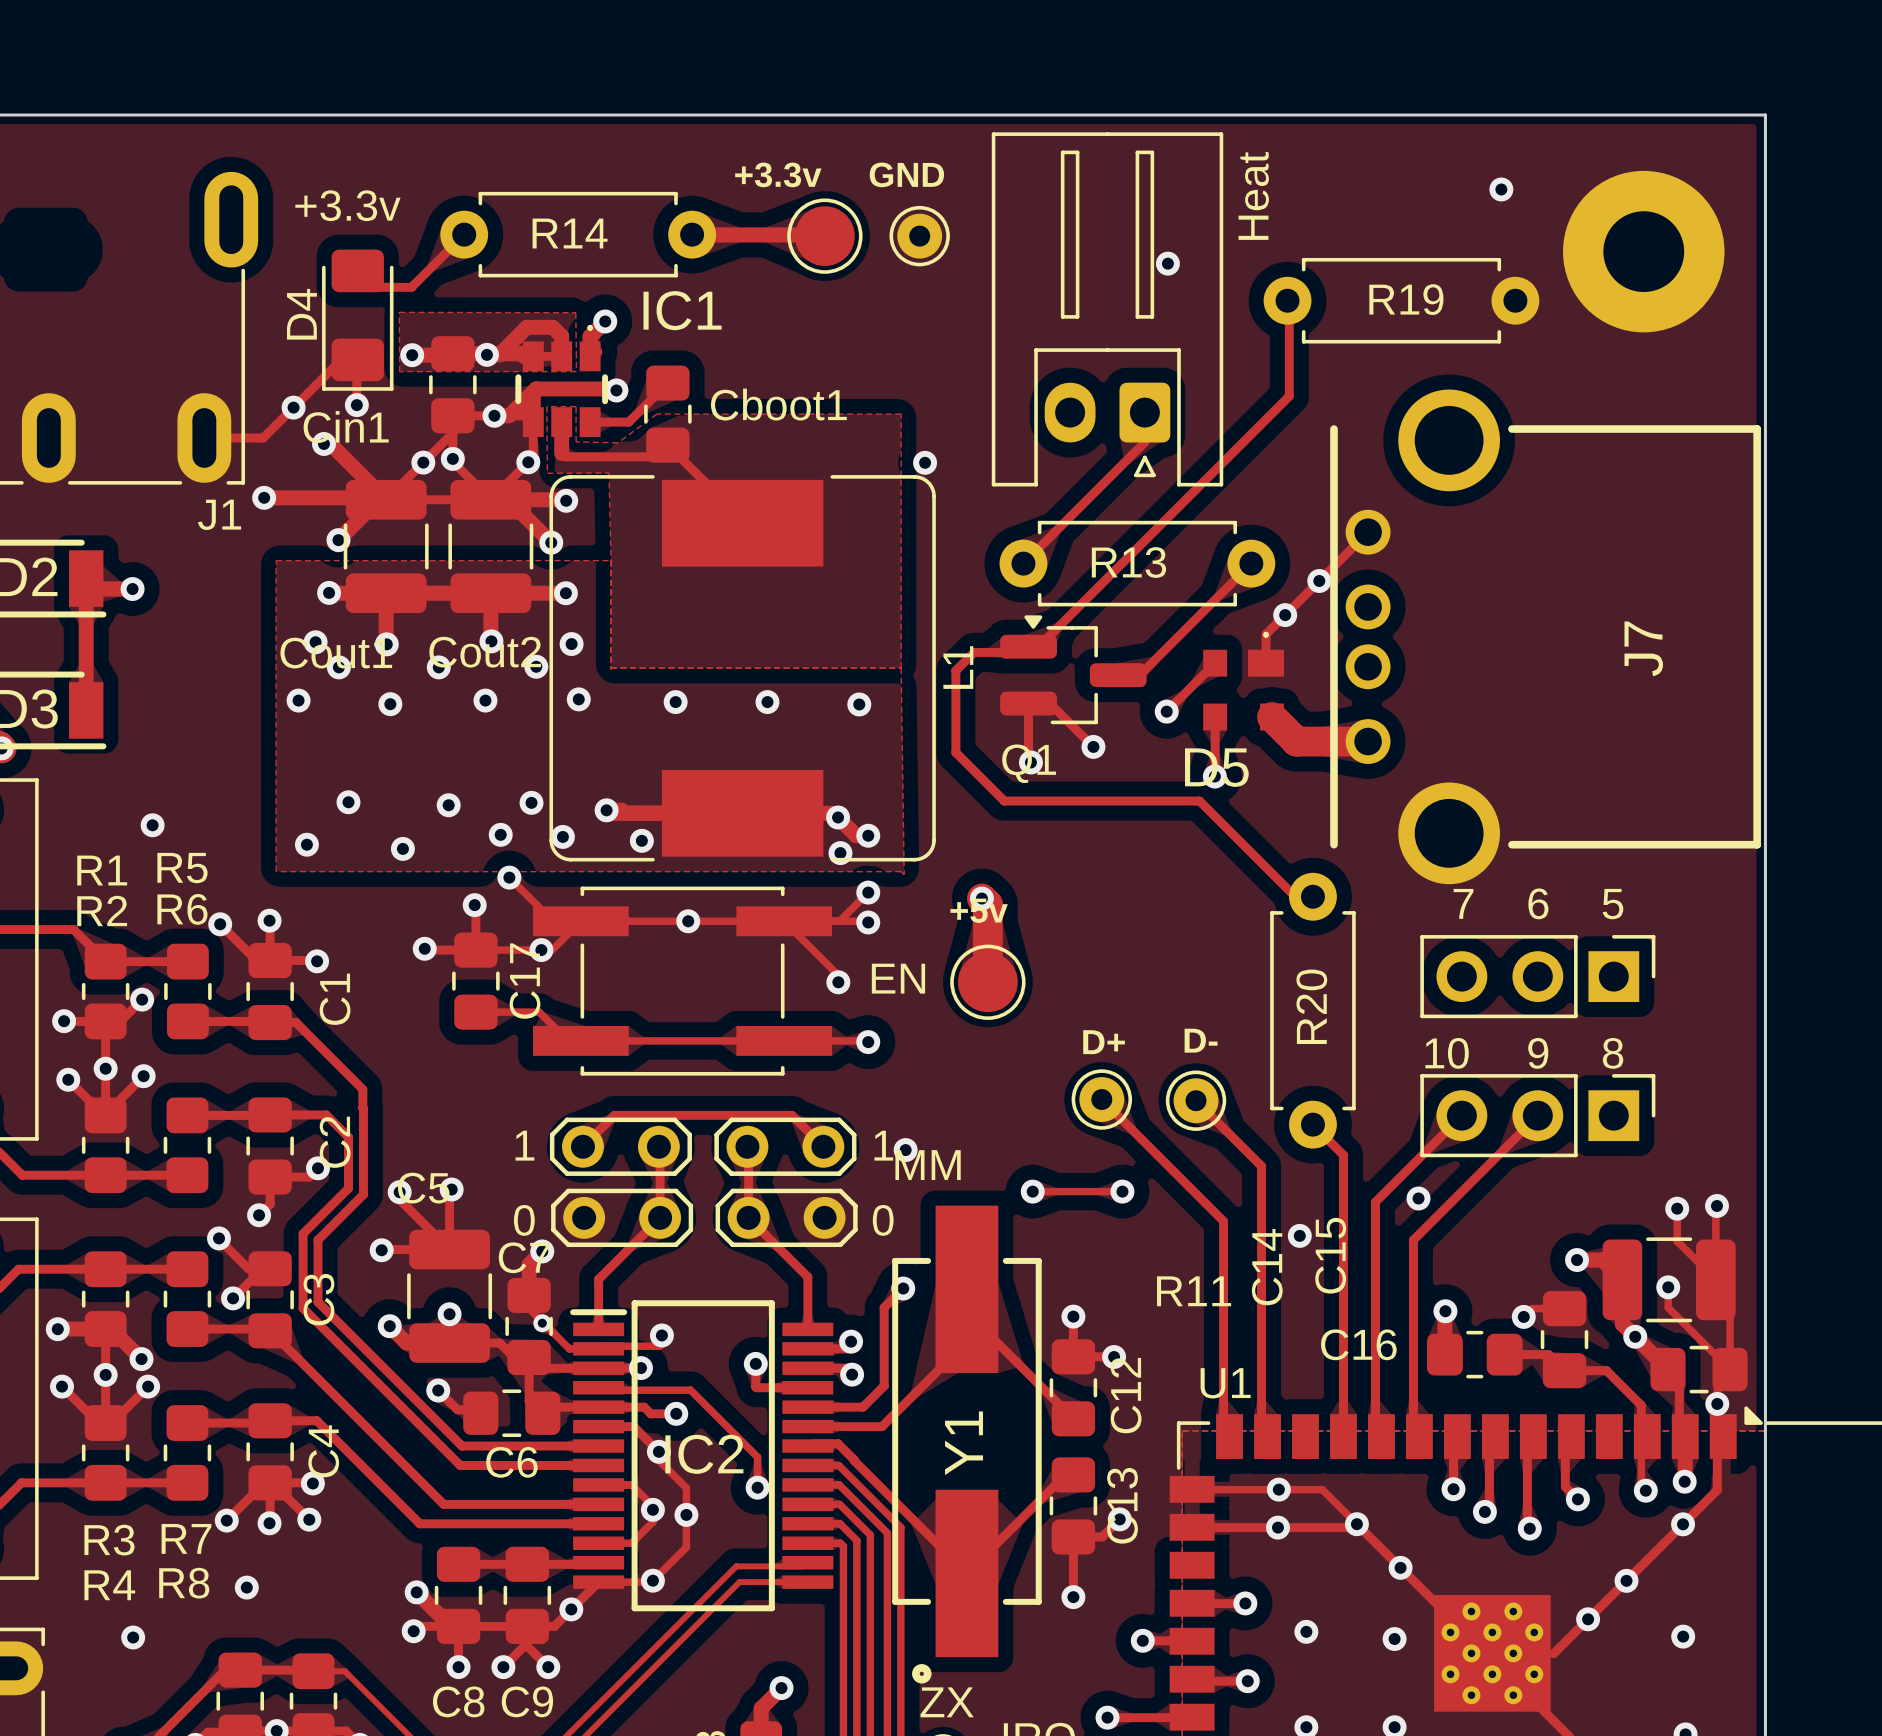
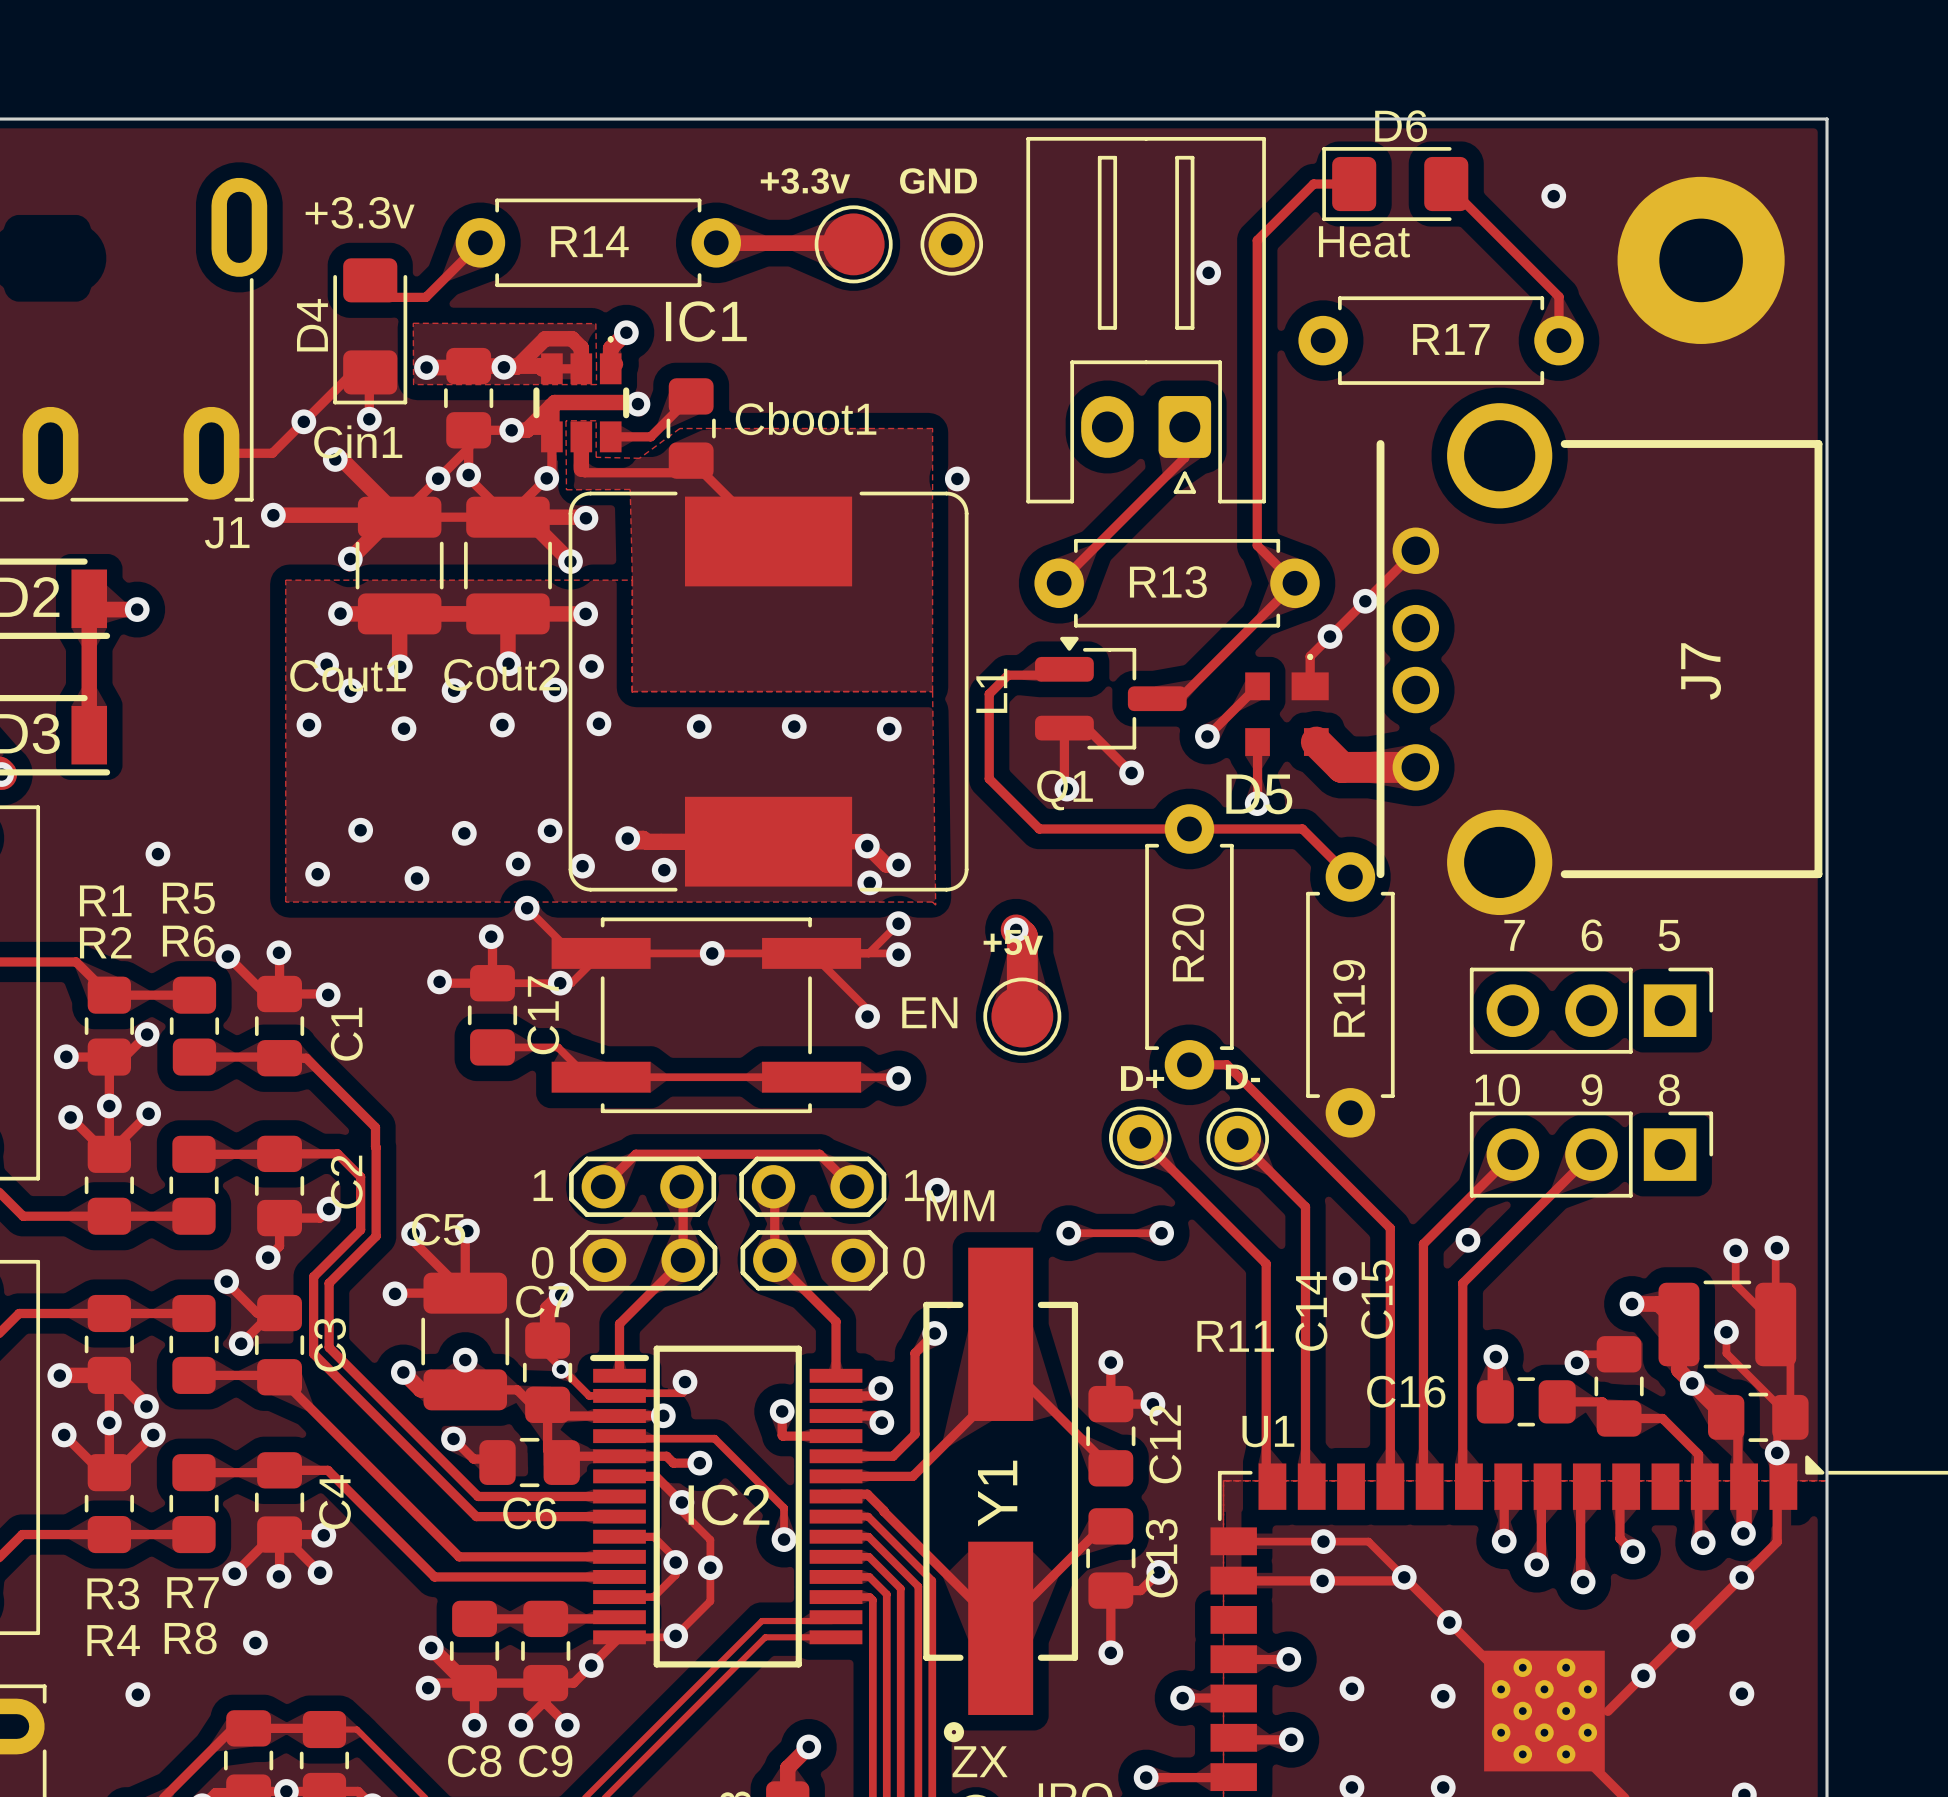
track: none -> (1354, 184) (1313, 184) (1257, 240) (1257, 545) (1295, 583)
D6: none -> (1395, 184)
track: none -> (1446, 184) (1558, 296) (1558, 340)
text rotation: 0° (1253, 195) -> 90° clockwise (1364, 241)
track: (1287, 300) (1289, 302) (1289, 396) (1038, 646) (1028, 646) -> none
R19 rotation: 0° (1401, 300) -> 90° clockwise (1350, 994)
R19 position: (1401, 300) -> (1350, 994)
R17: none -> (1441, 340)
track: (1199, 801) (1295, 896) (1312, 896) -> (1241, 829) (1302, 829) (1350, 876)
R20 position: (1312, 1010) -> (1189, 946)
track: (1305, 1132) (1312, 1124) (1343, 1155) (1343, 1186) -> (1189, 1064) (1226, 1064) (1390, 1228)

